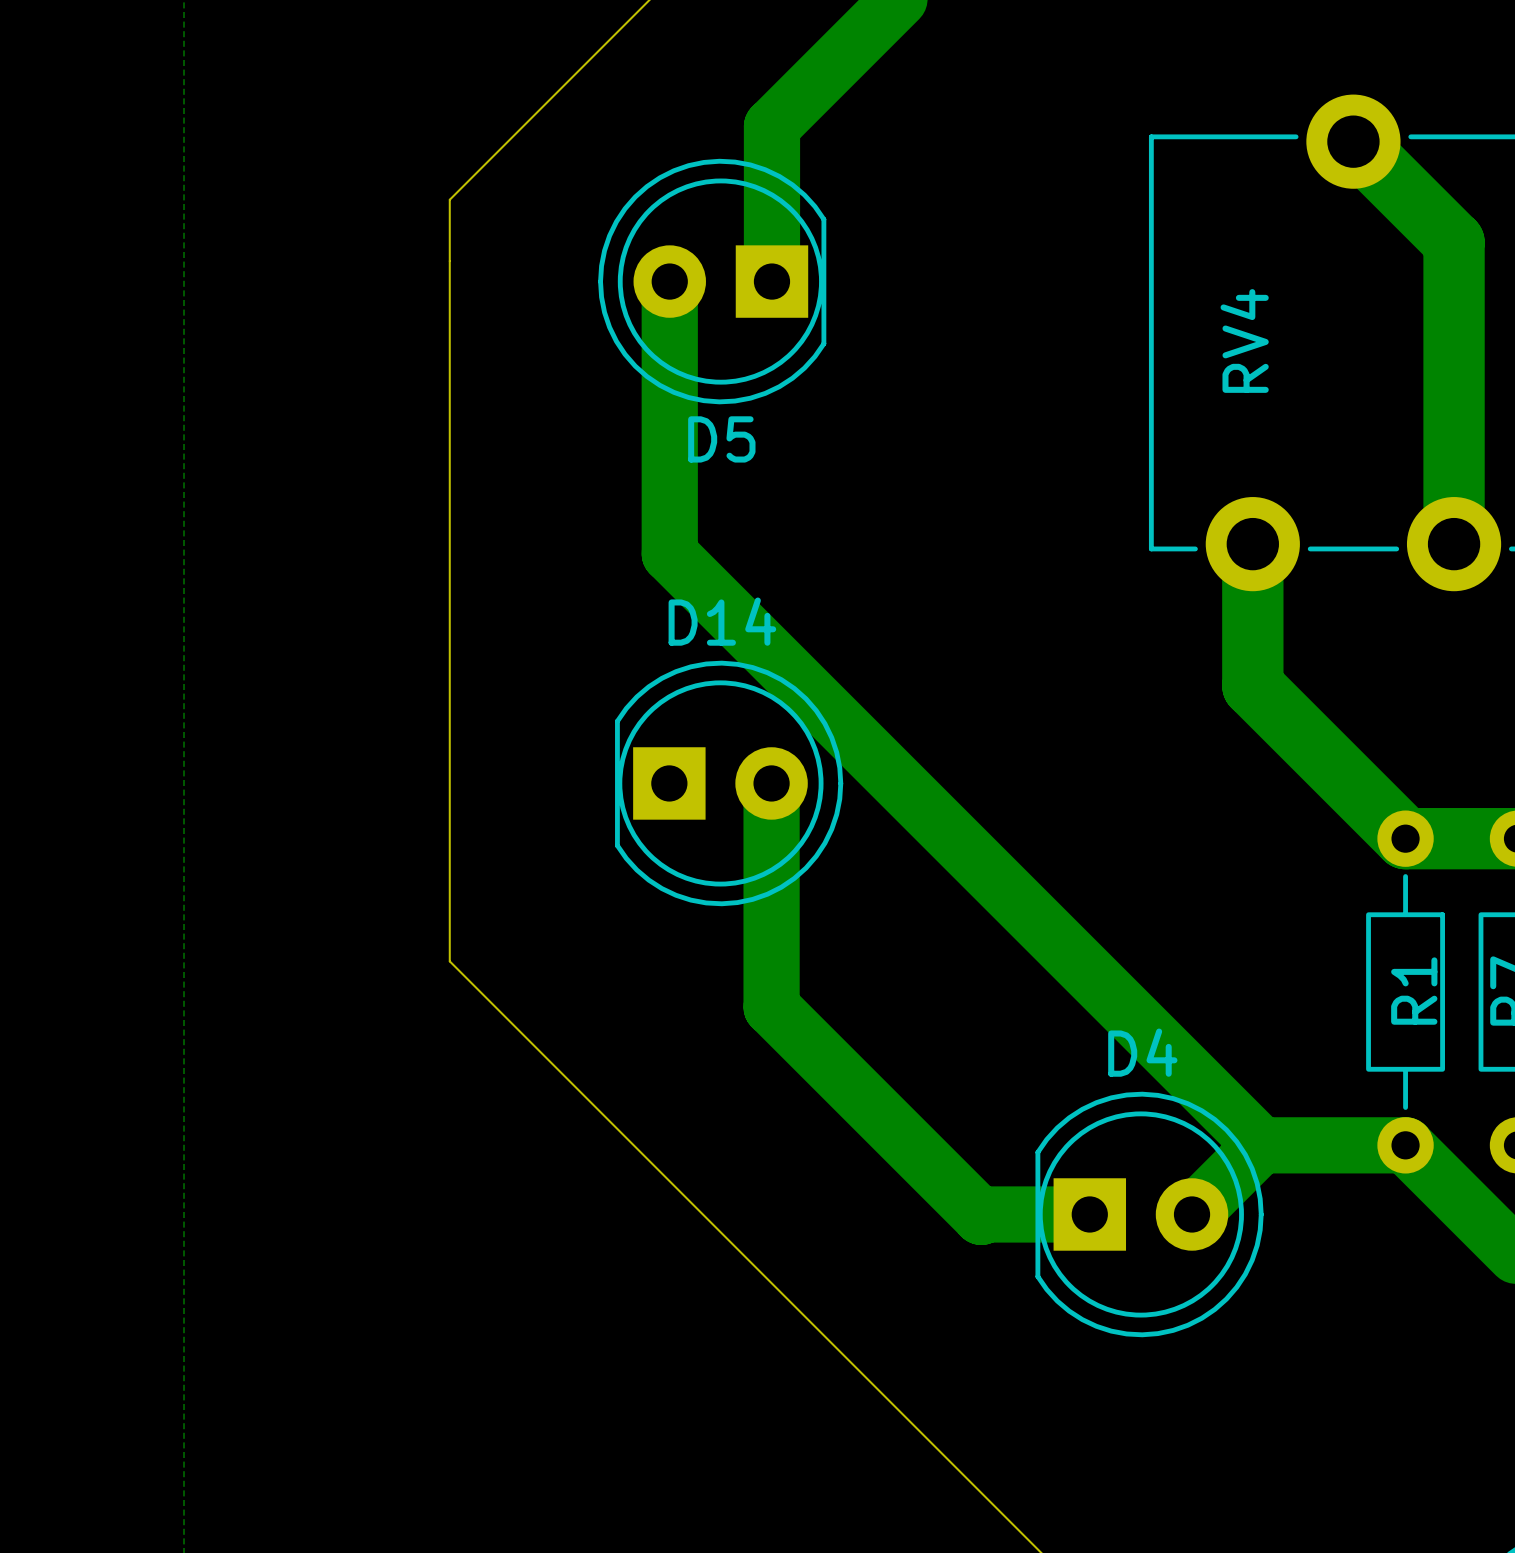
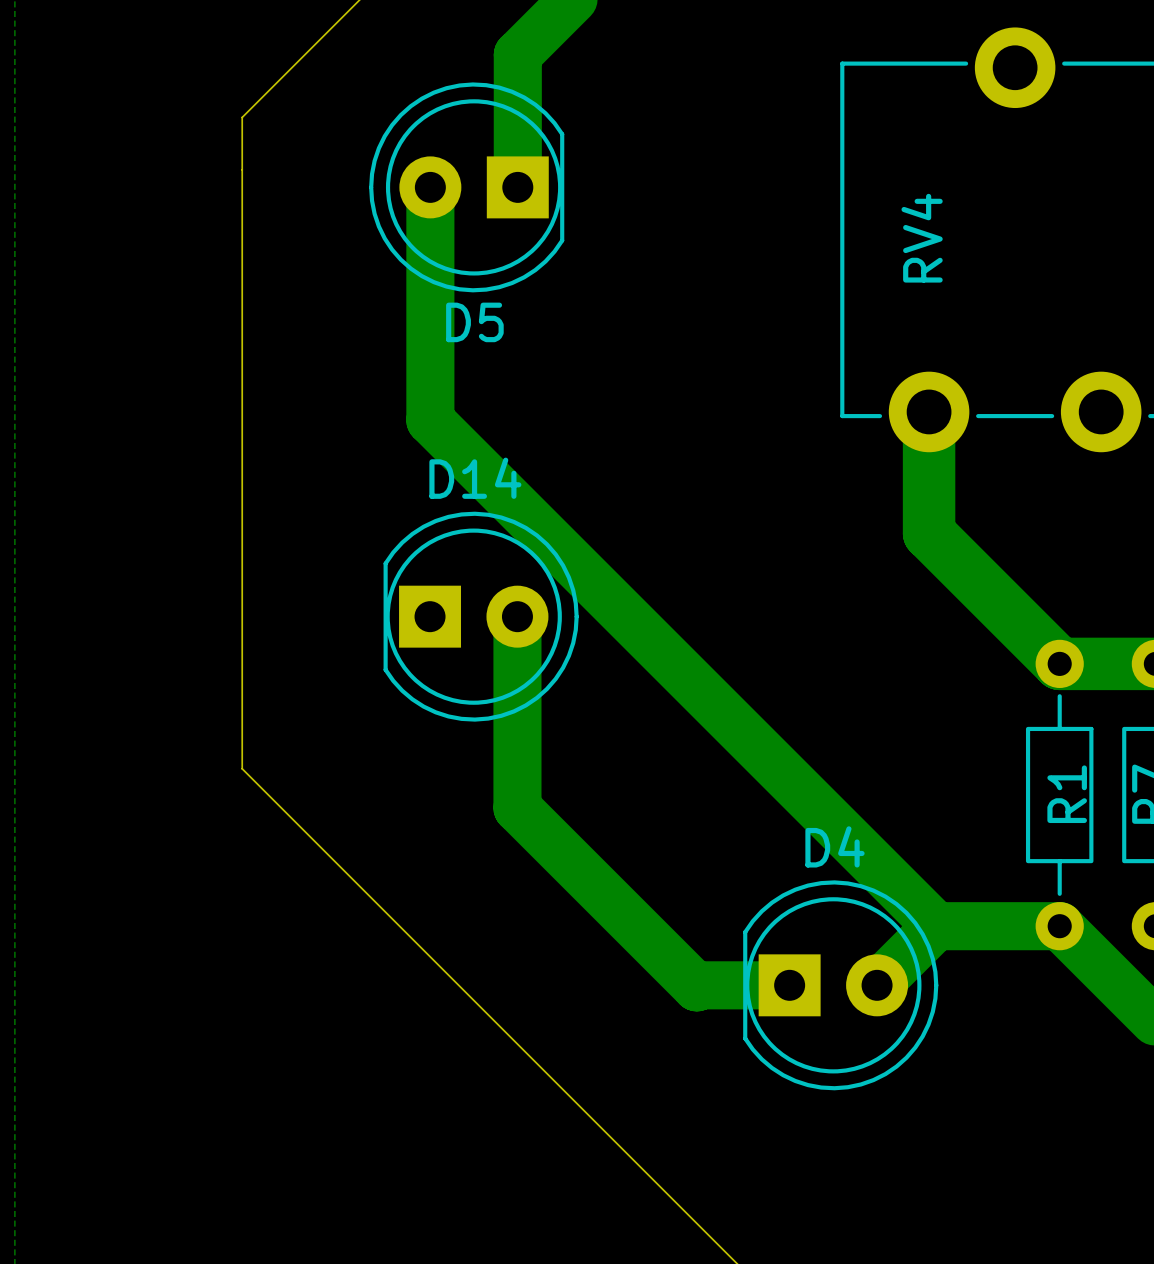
bottom track: (1353, 141) (1454, 242) (1454, 544) -> none

